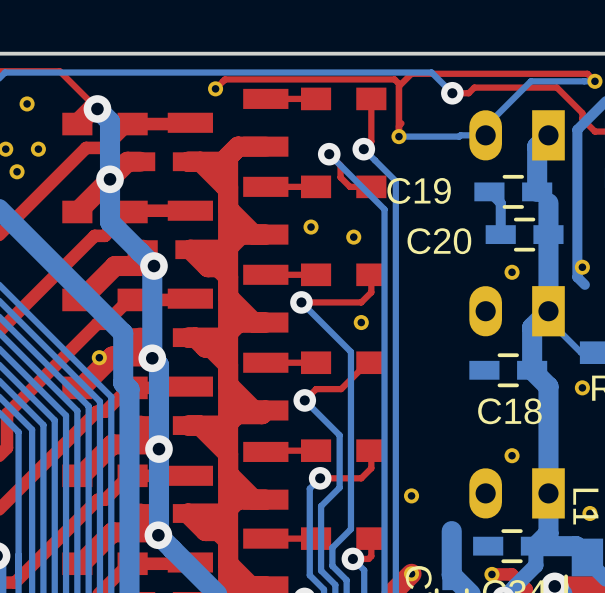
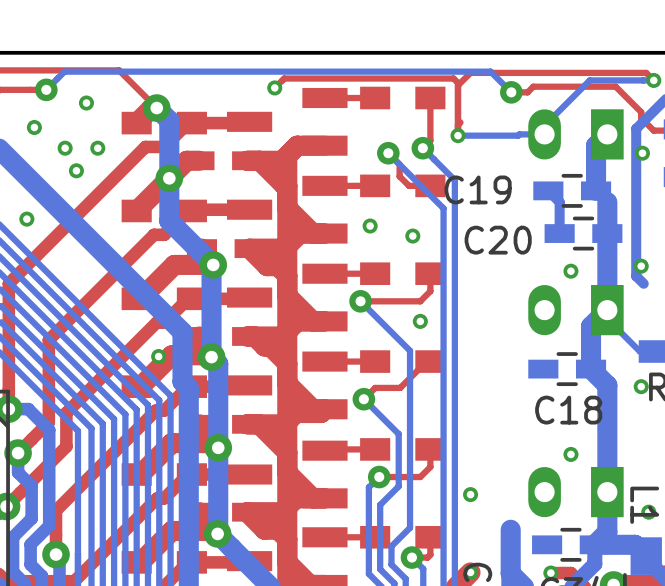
part: none -> (642, 153)

